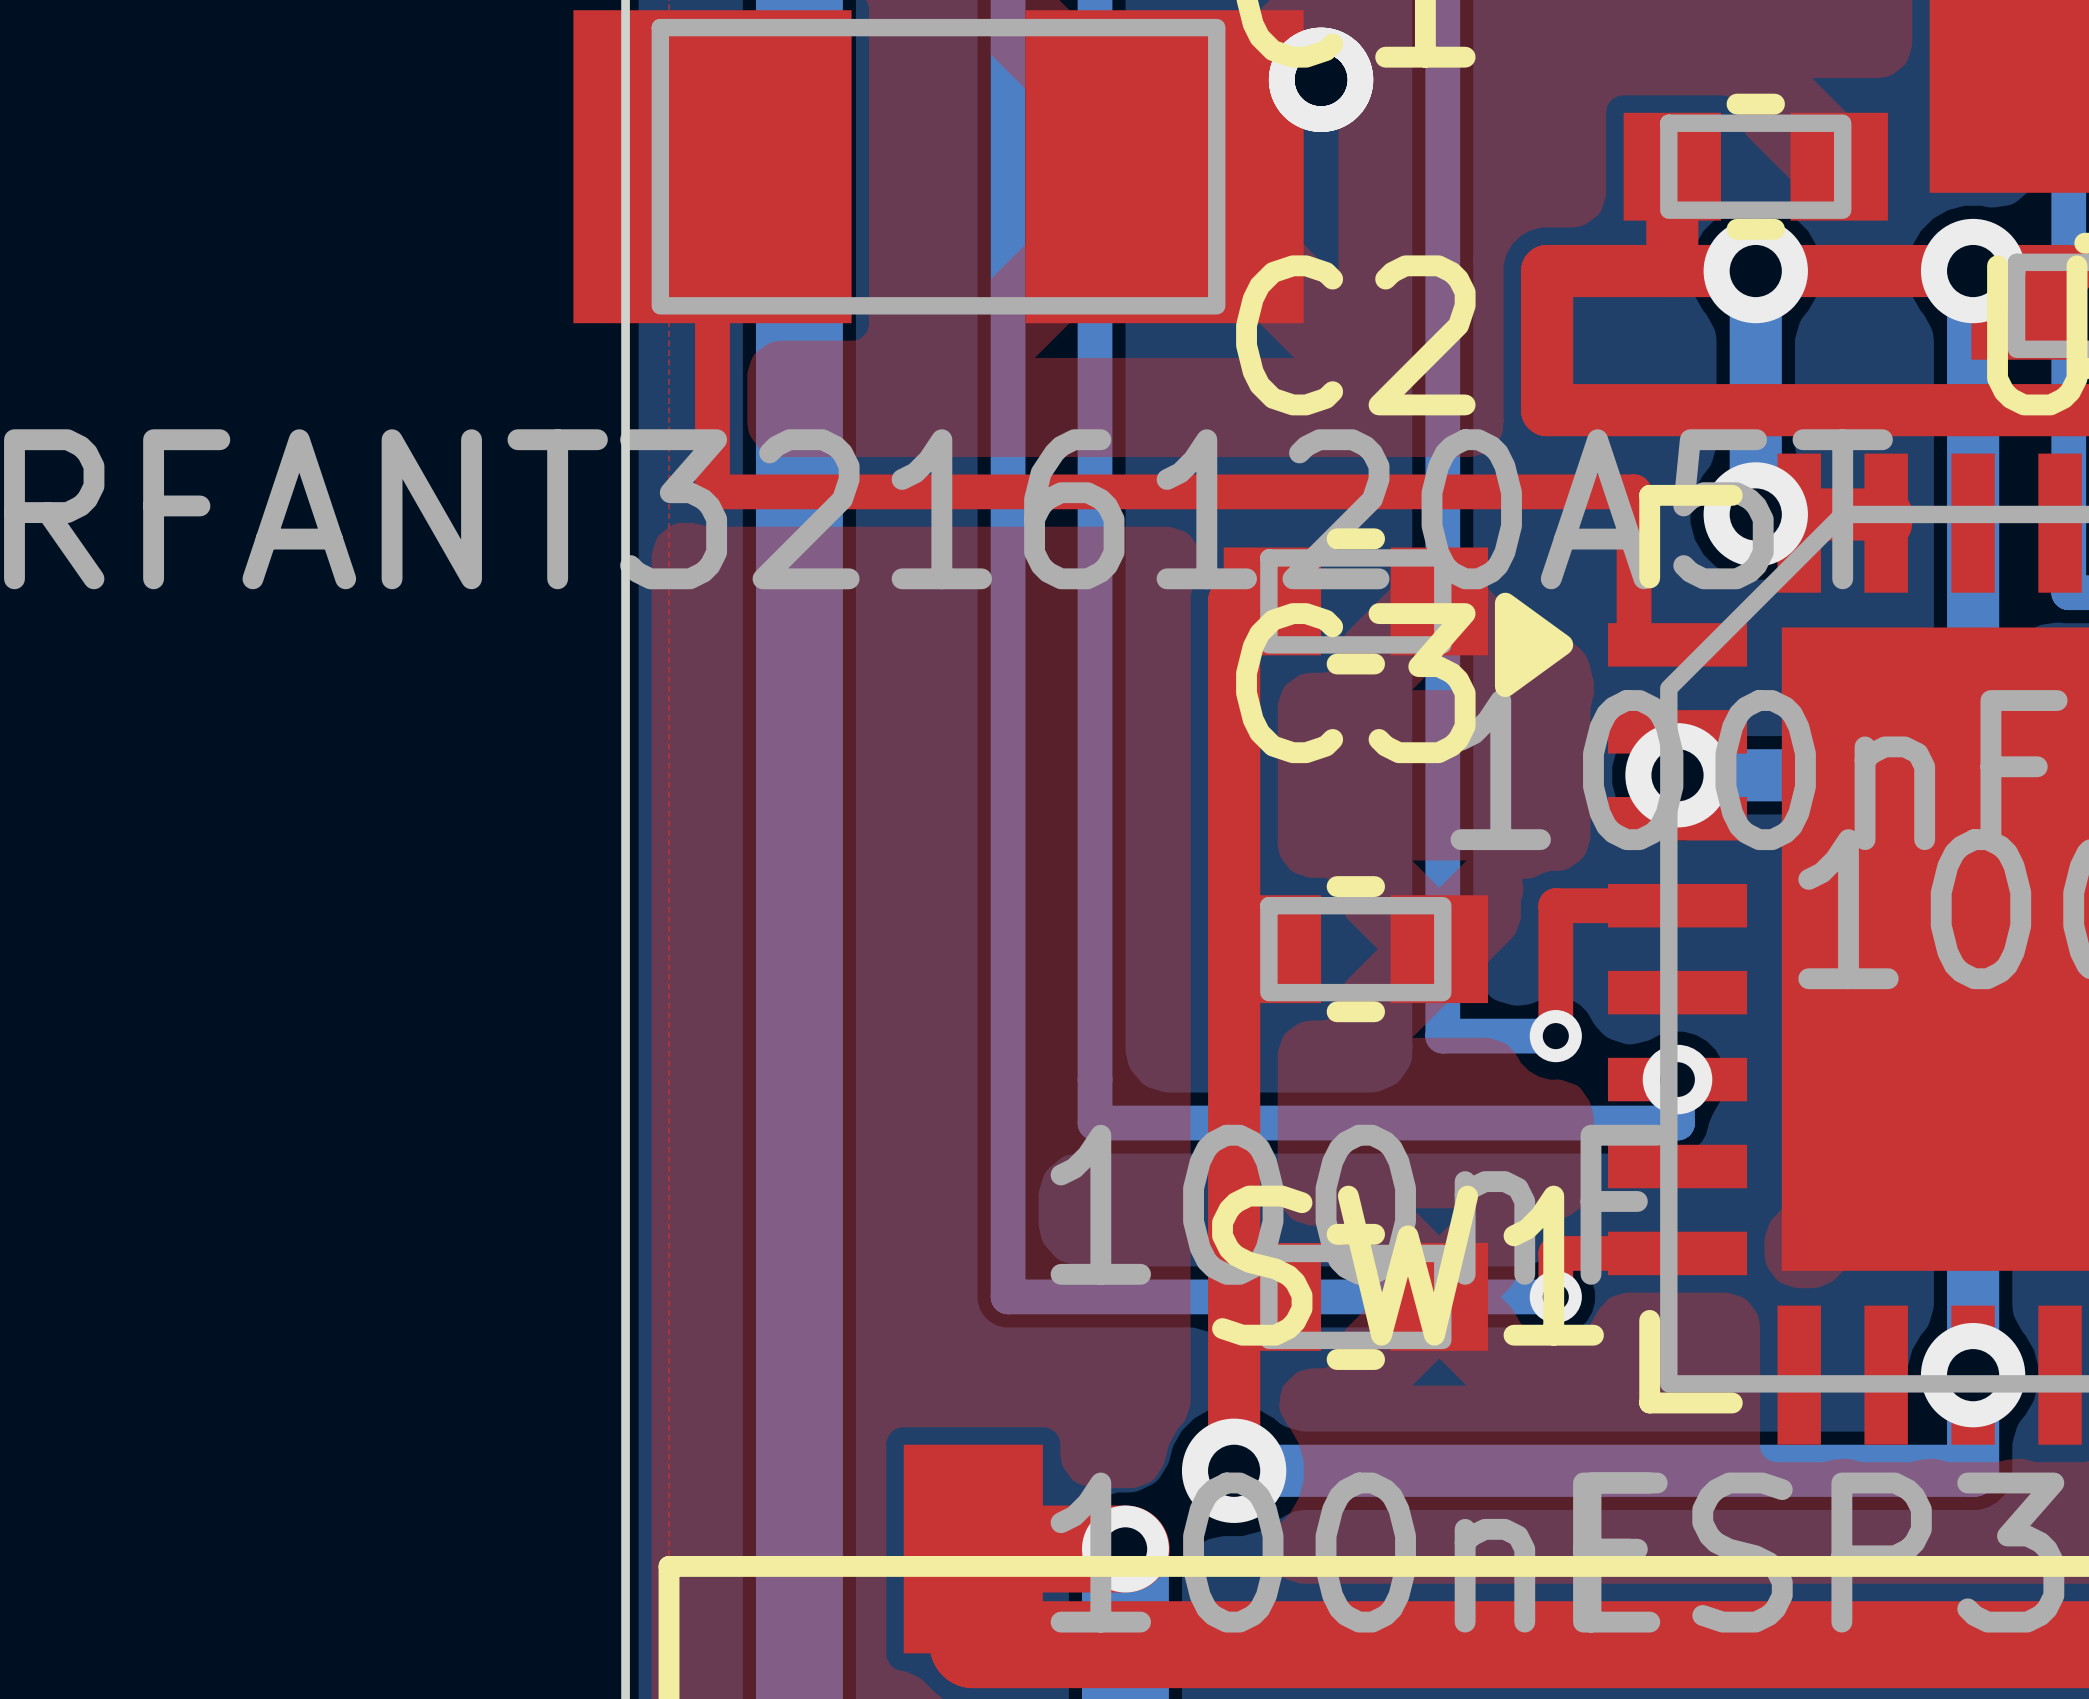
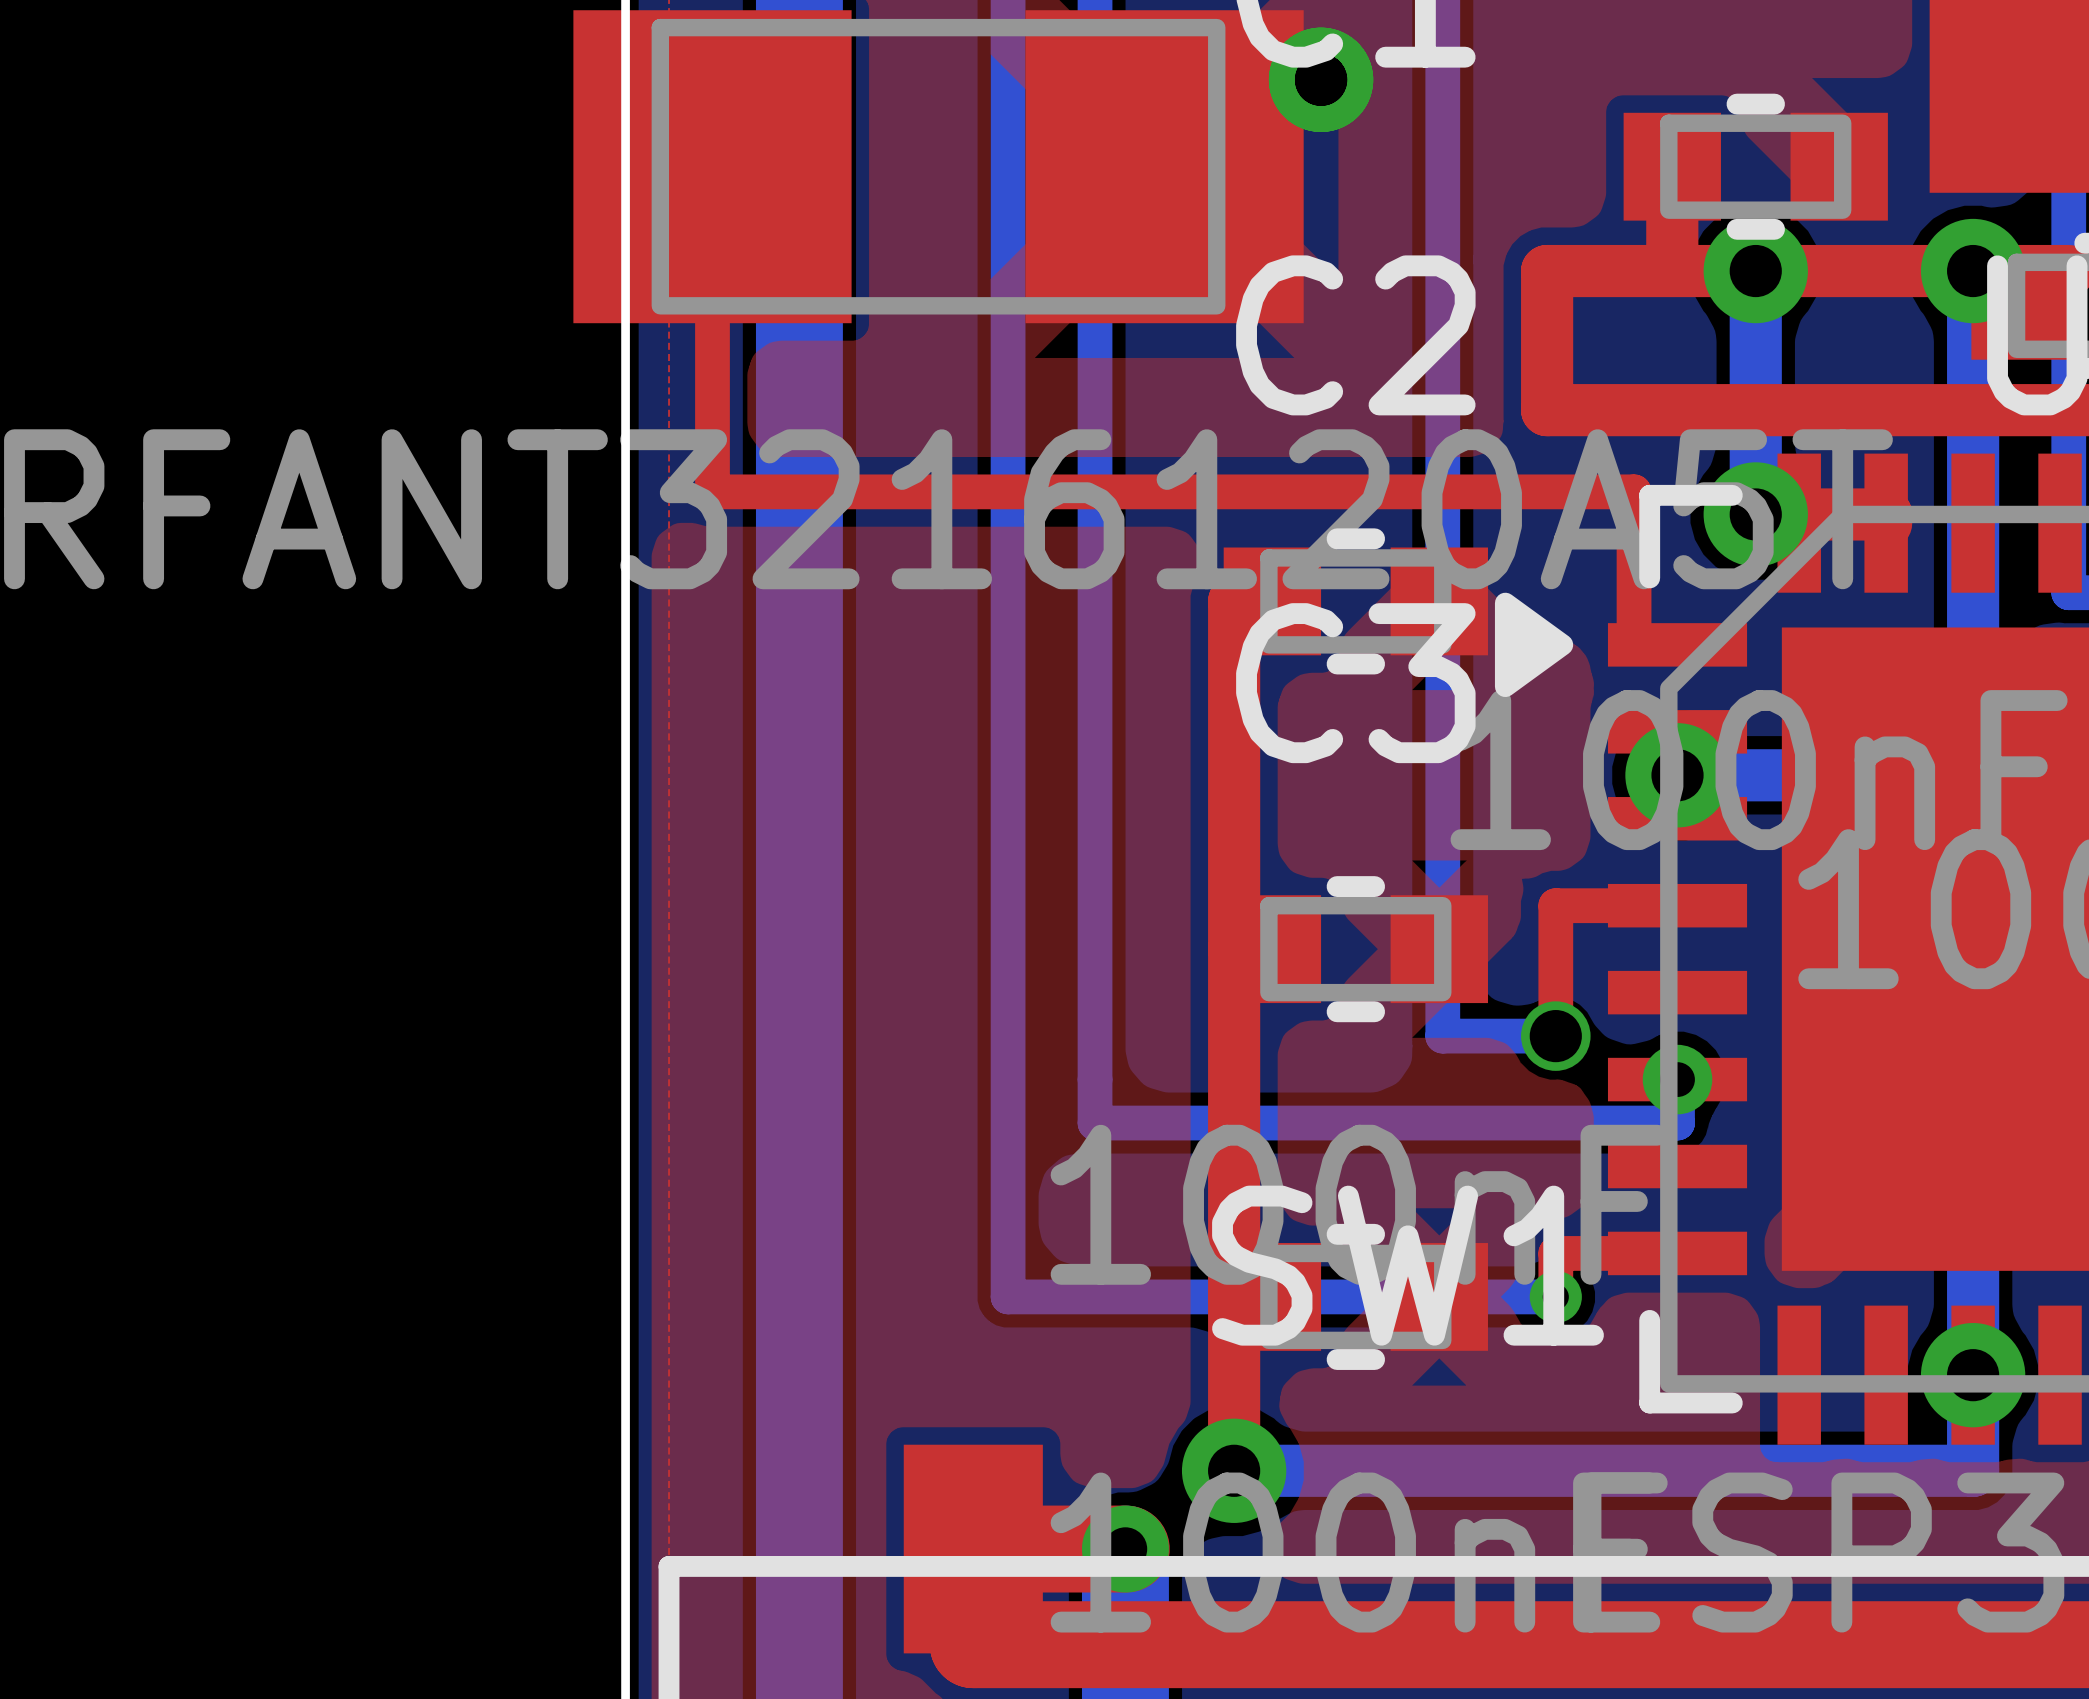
via size: [1529, 1010, 1582, 1063] -> [1521, 1001, 1591, 1071]

